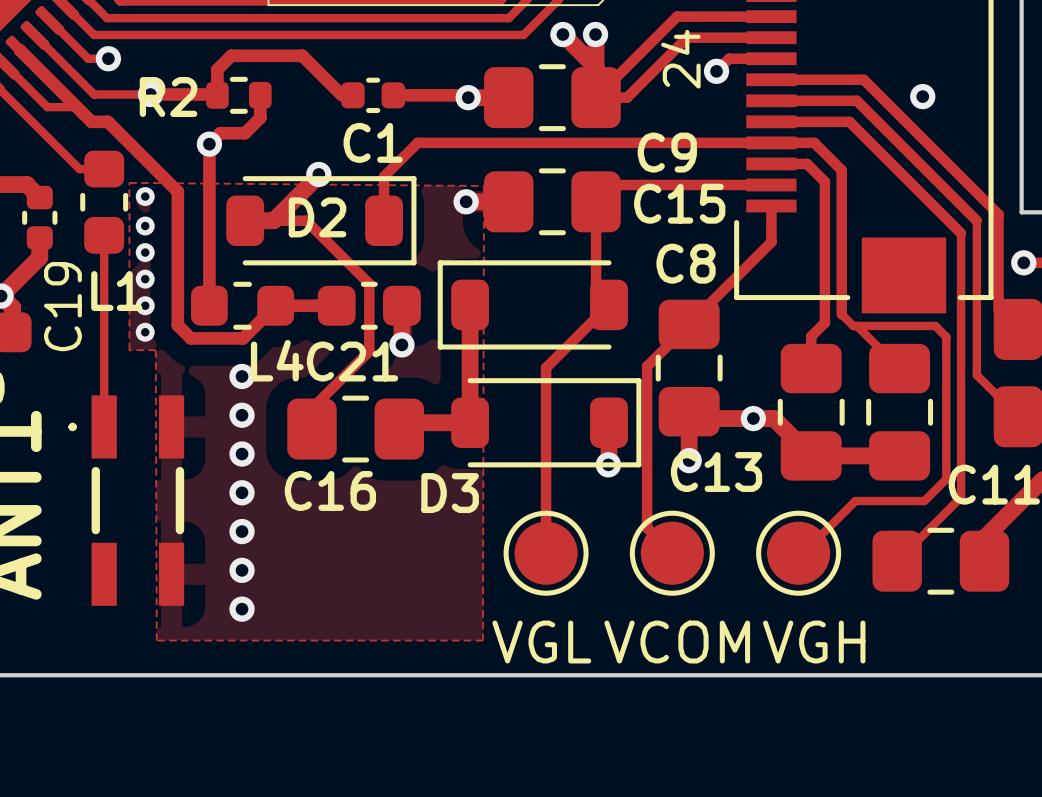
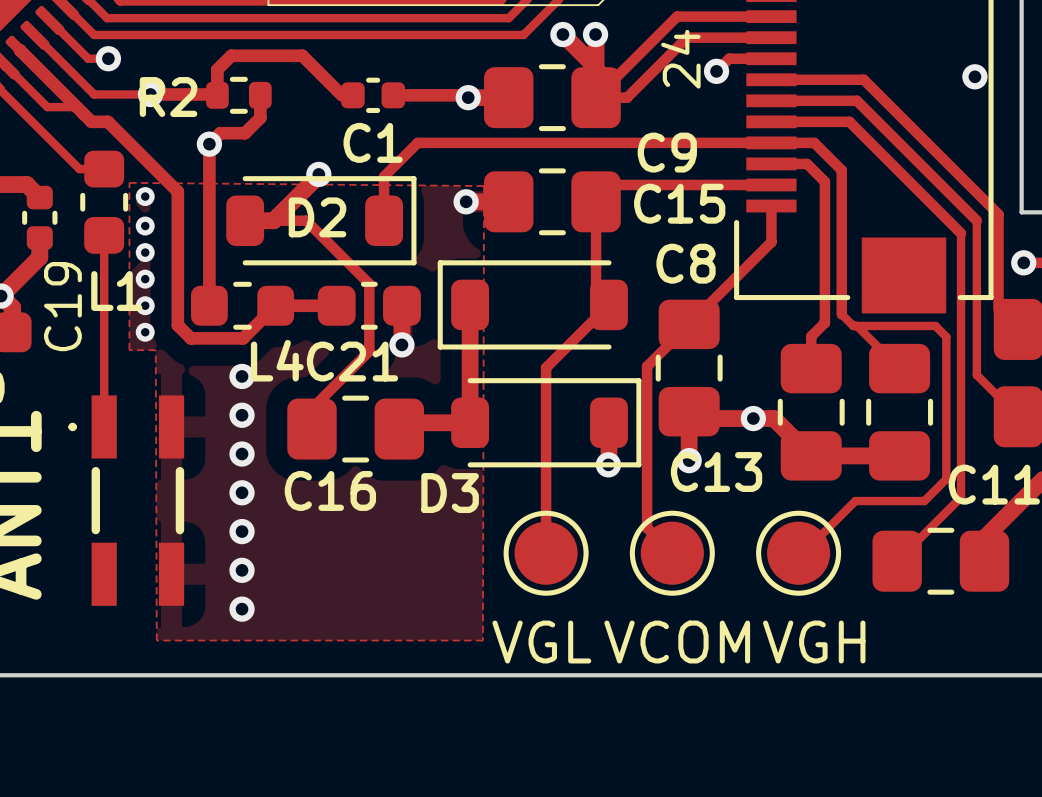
via position: (922, 96) -> (974, 76)

